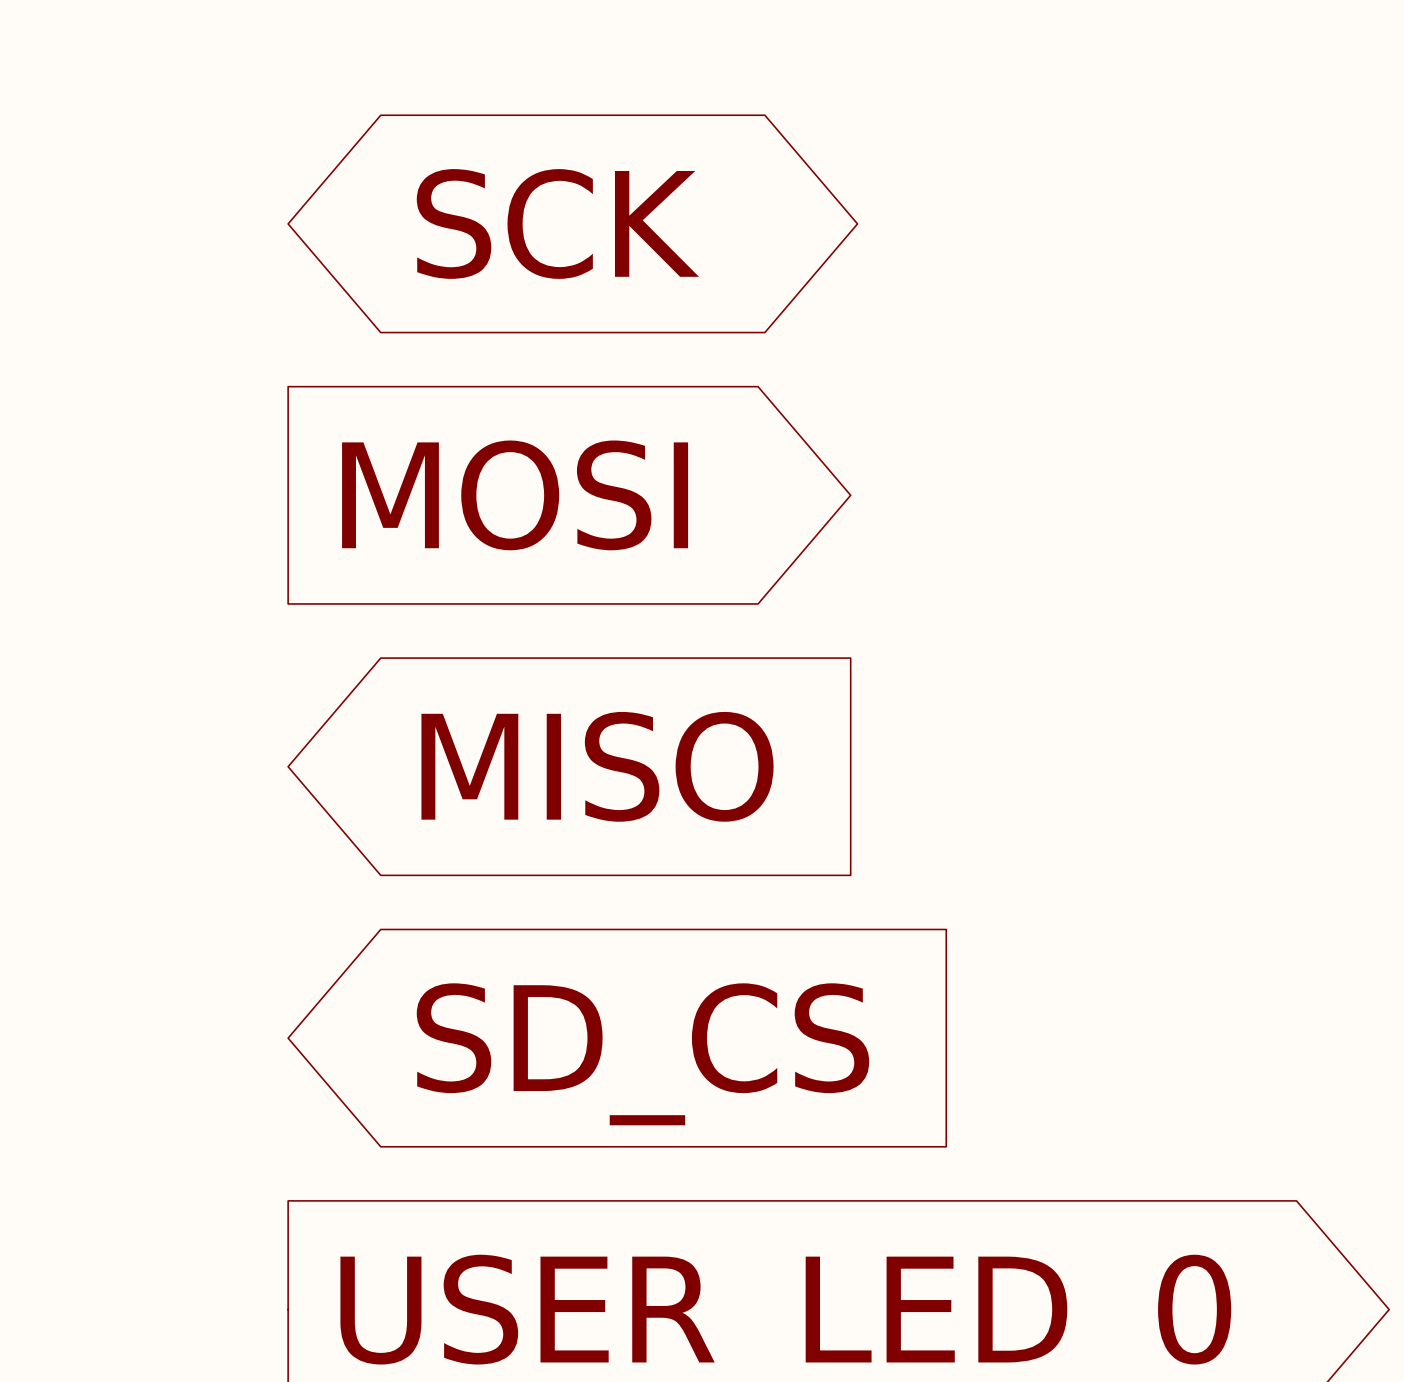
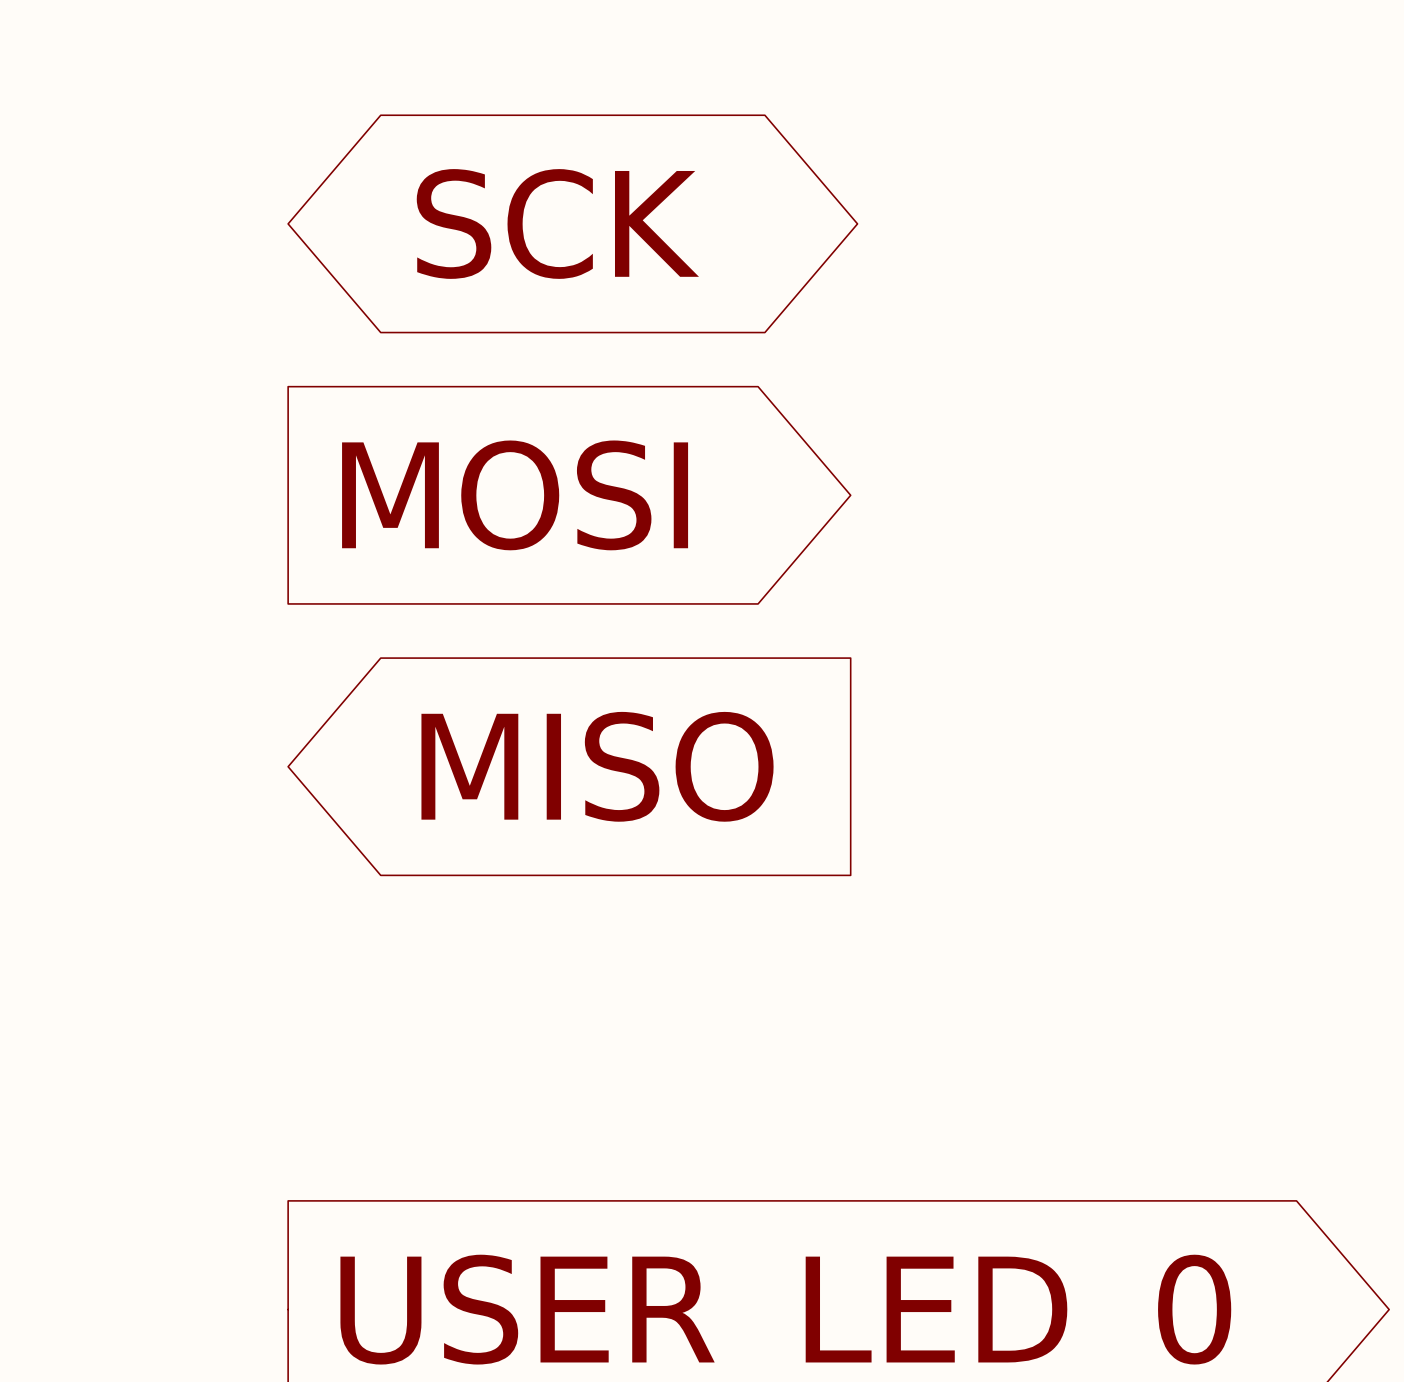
global label: SD_CS (642, 1054) -> none

